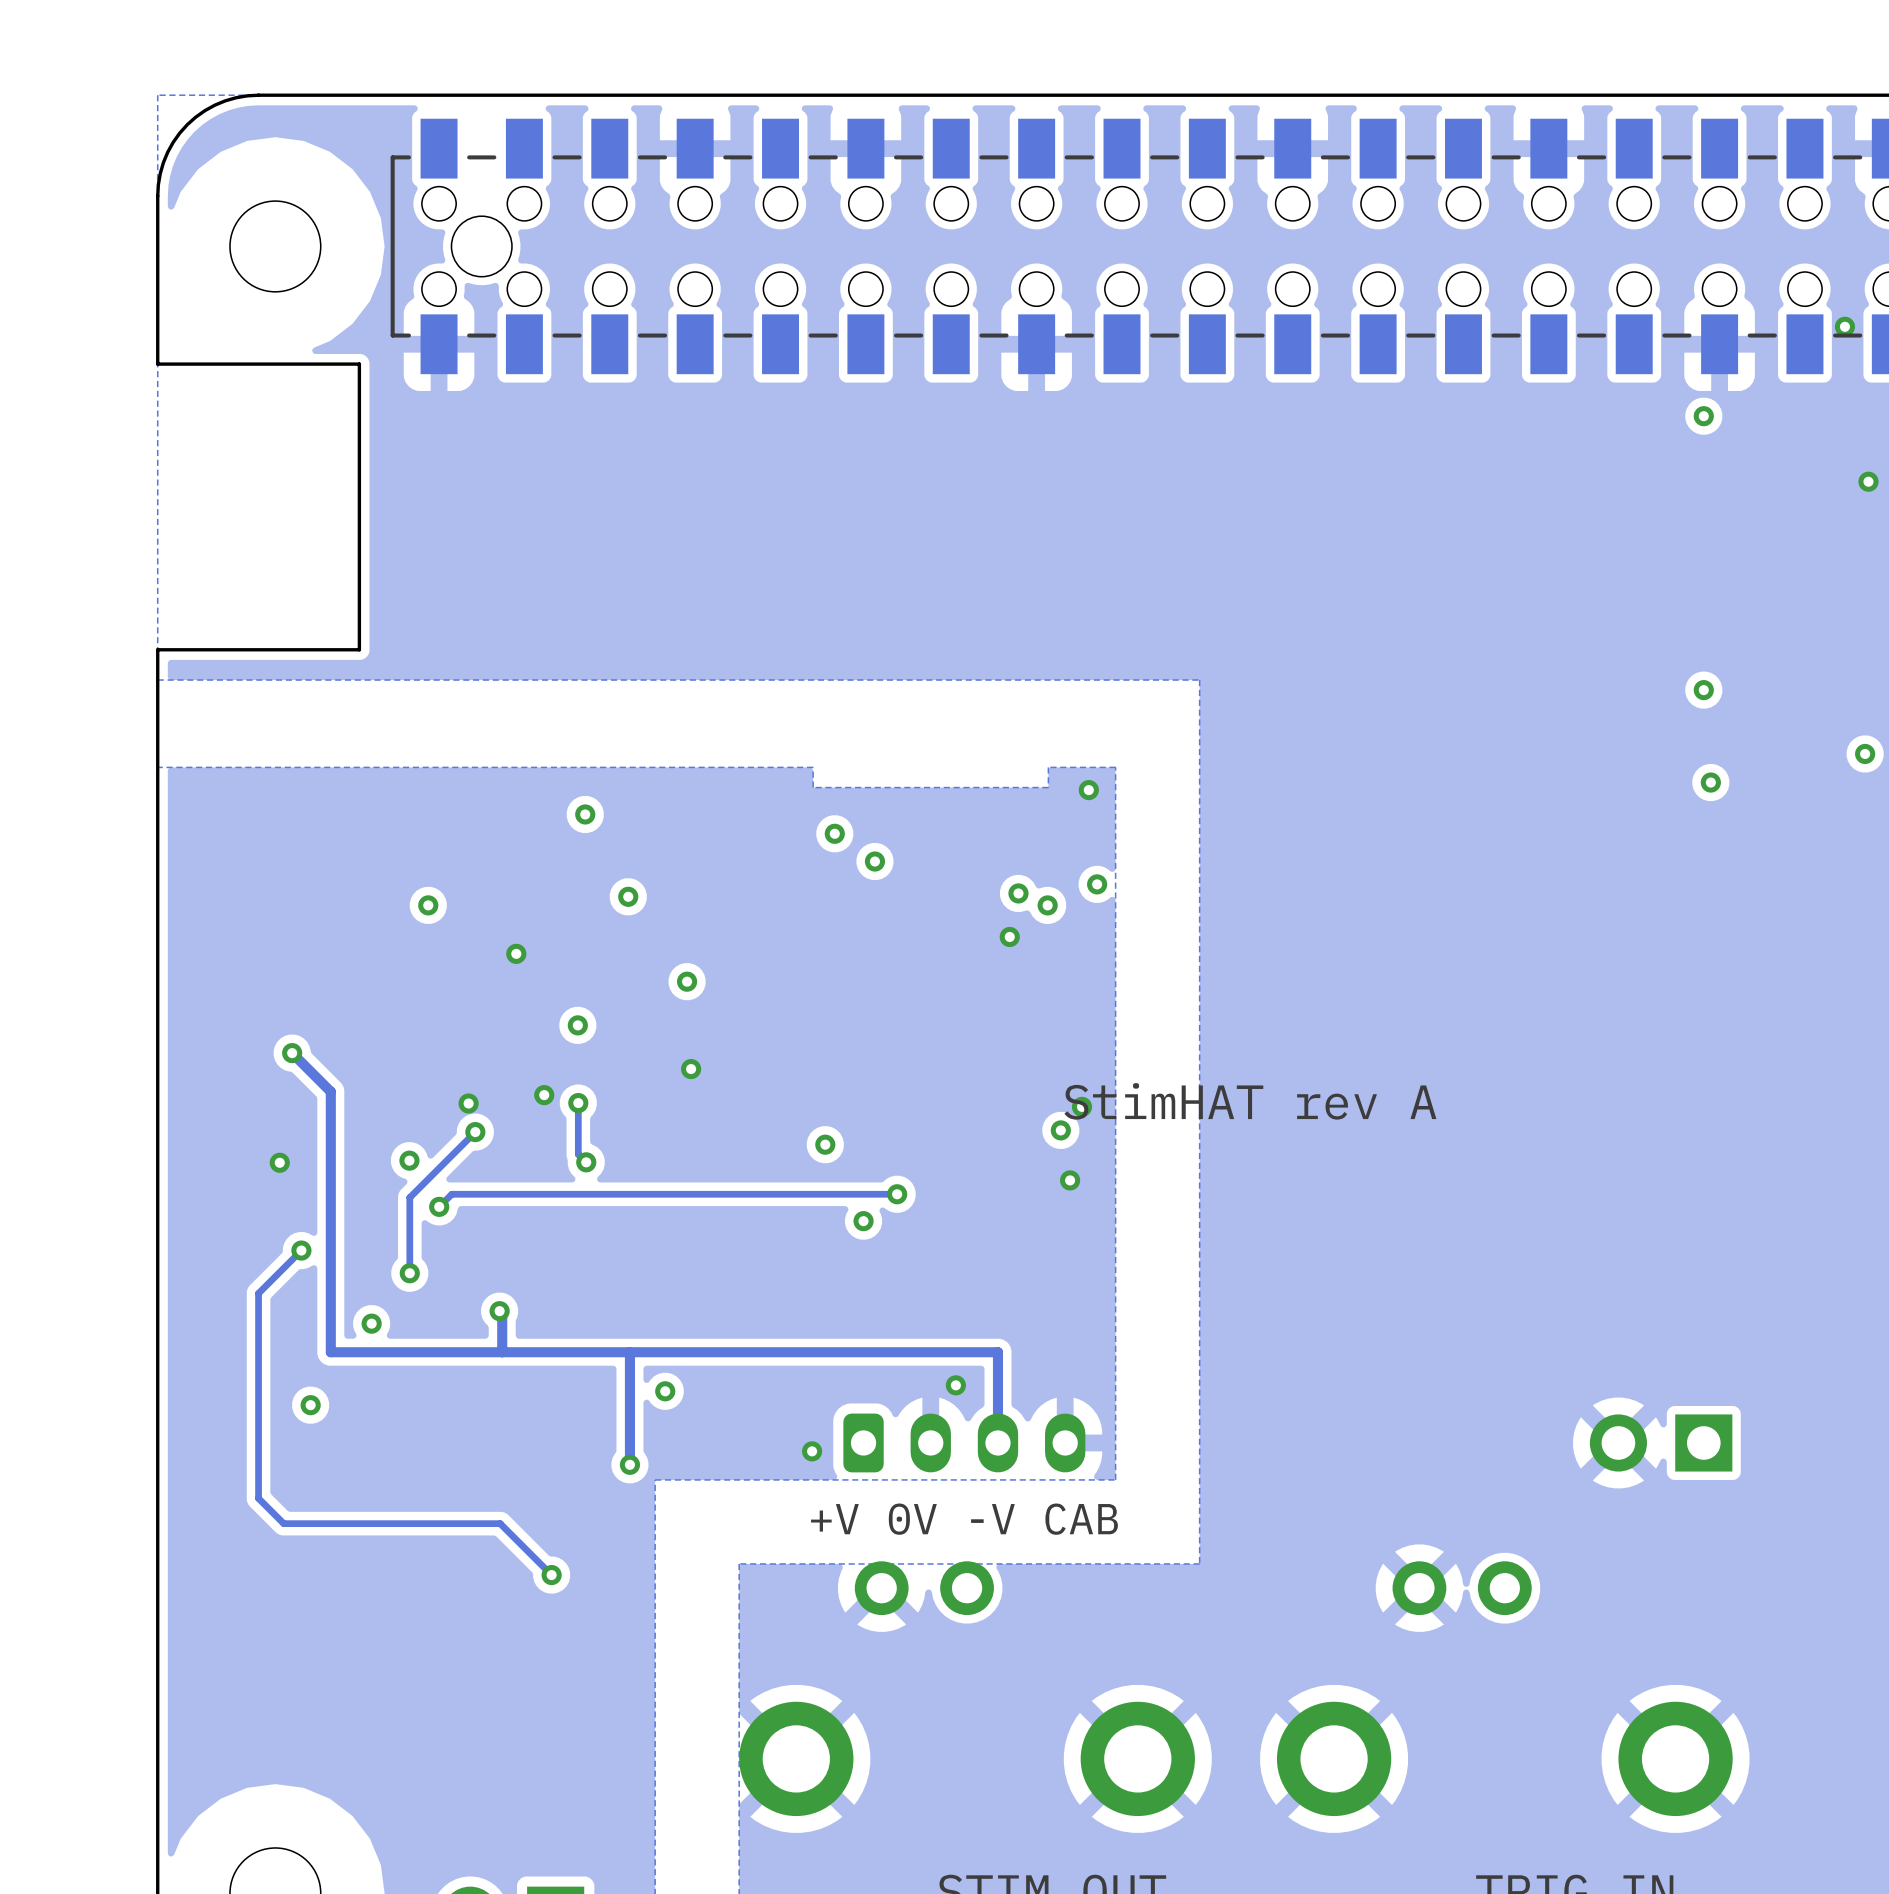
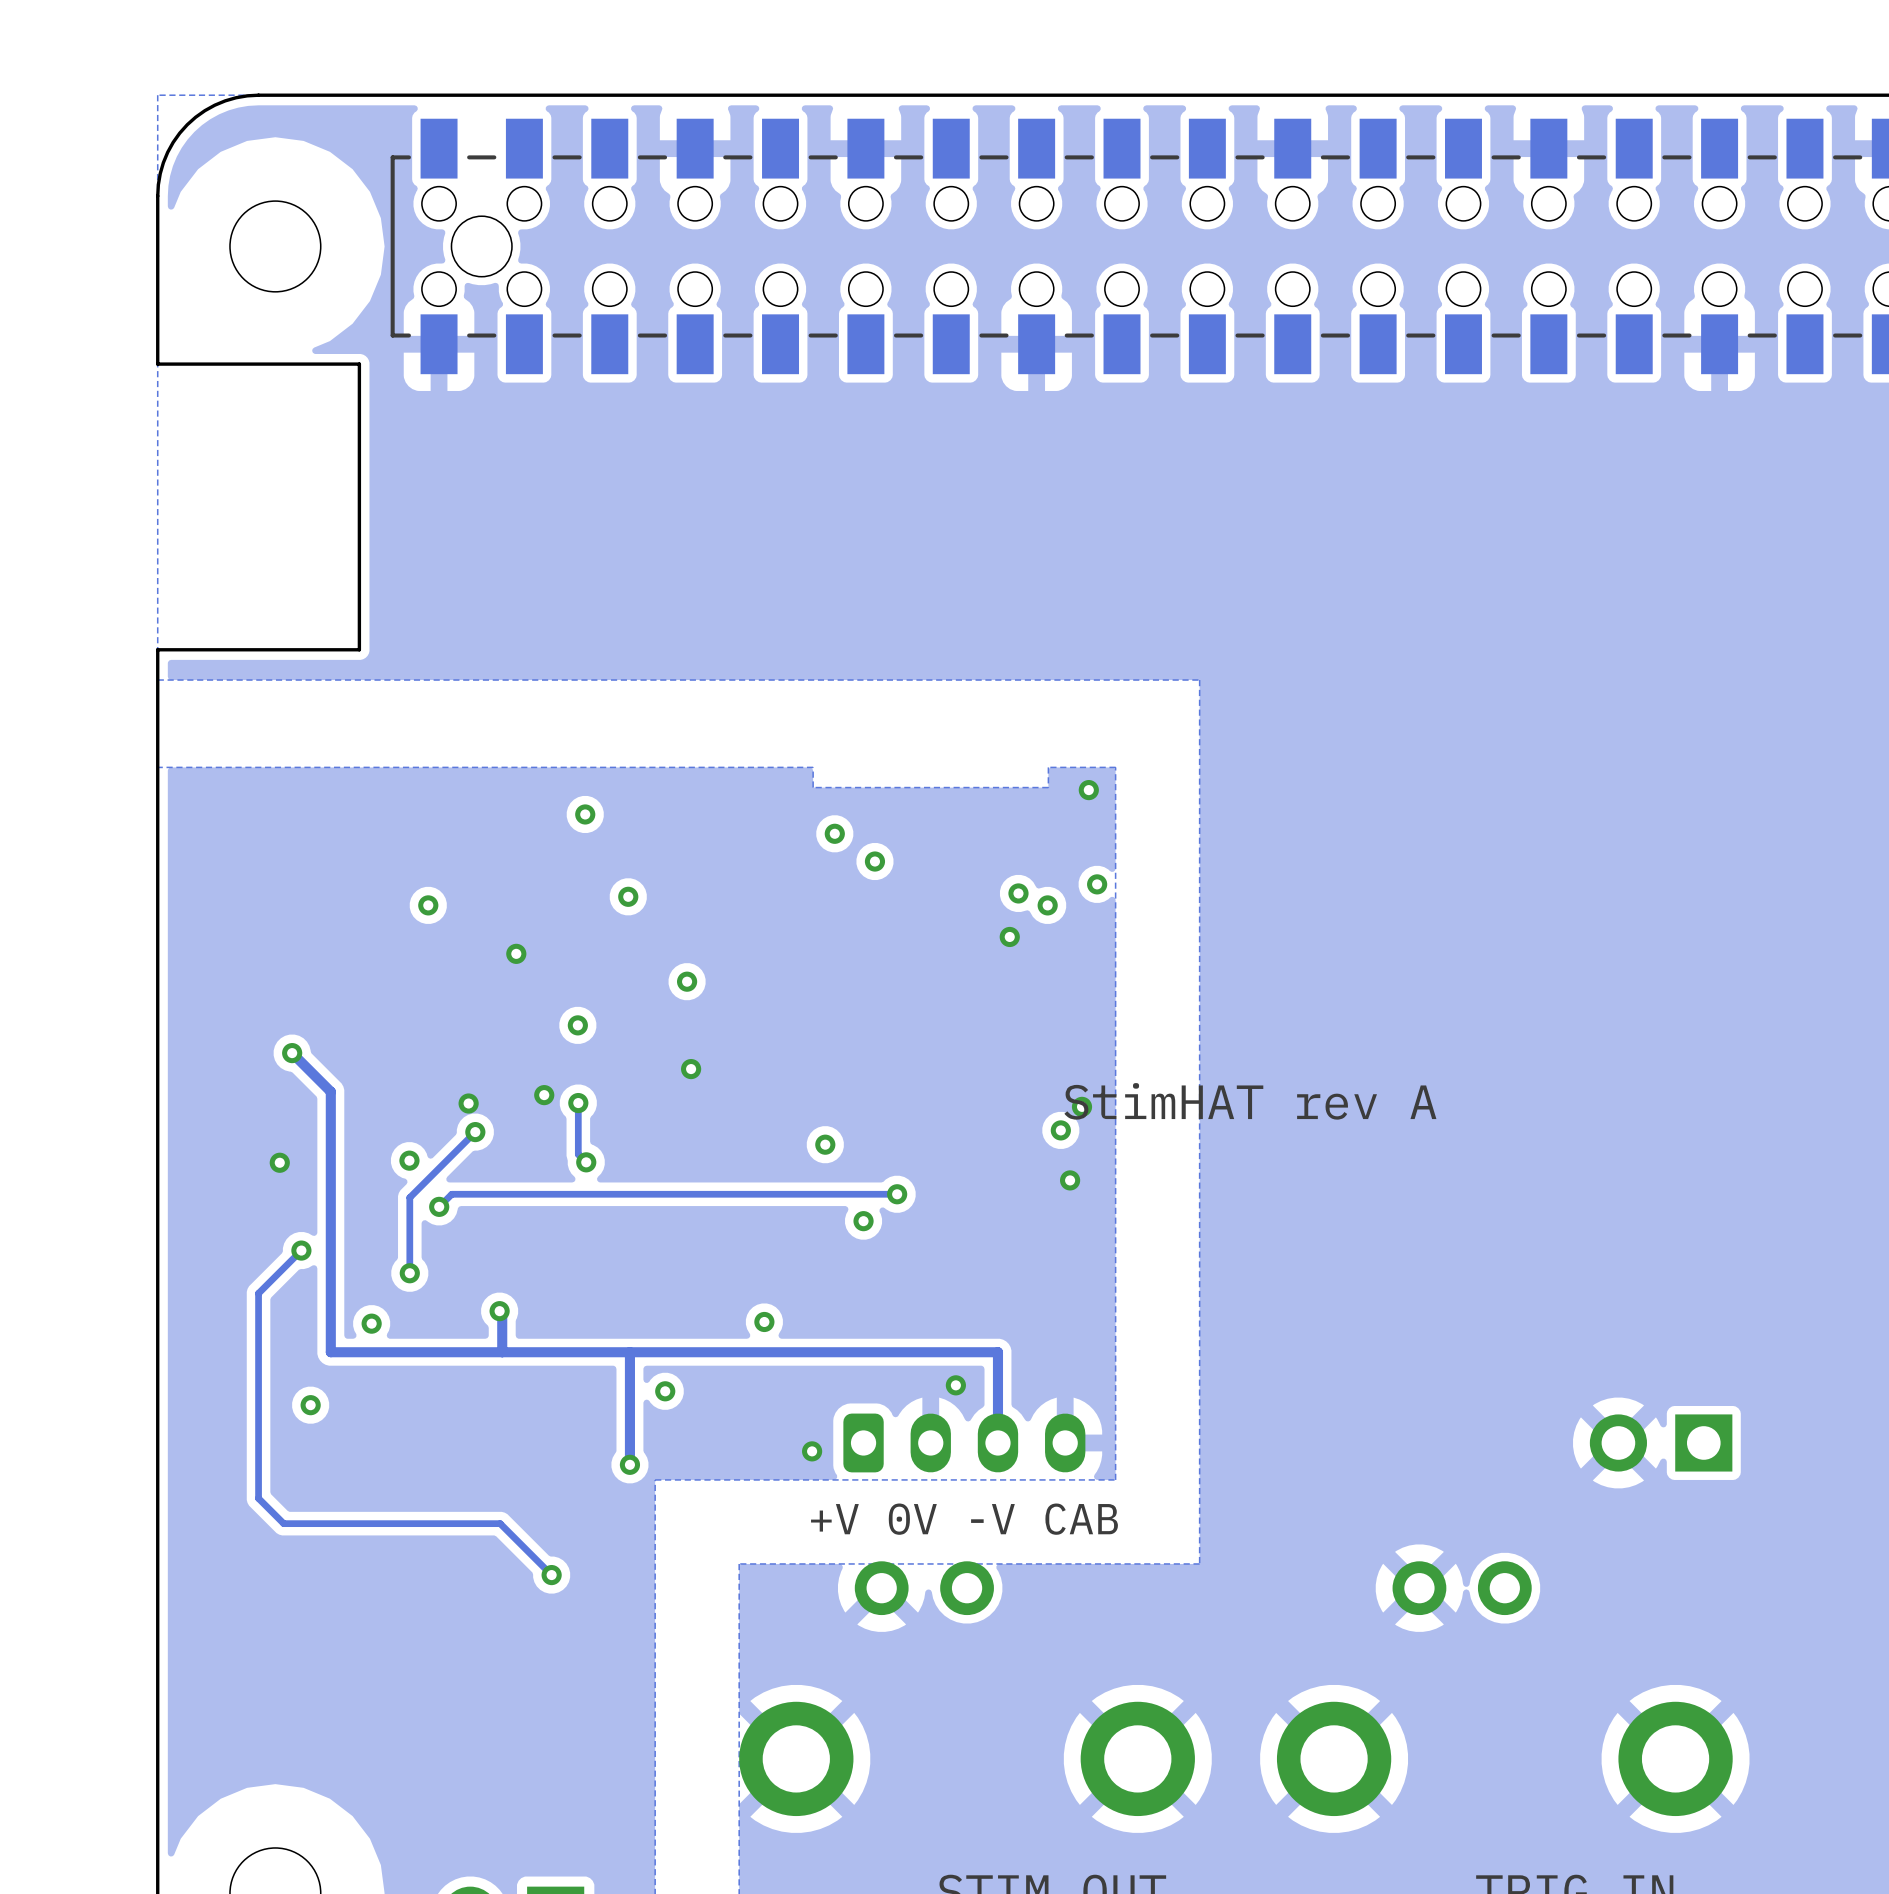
via: (1844, 326) -> none
via: (1703, 416) -> none
via: (1868, 481) -> none
via: (1703, 690) -> none
via: (1865, 753) -> none
via: (1710, 782) -> none
via: none -> (764, 1321)

